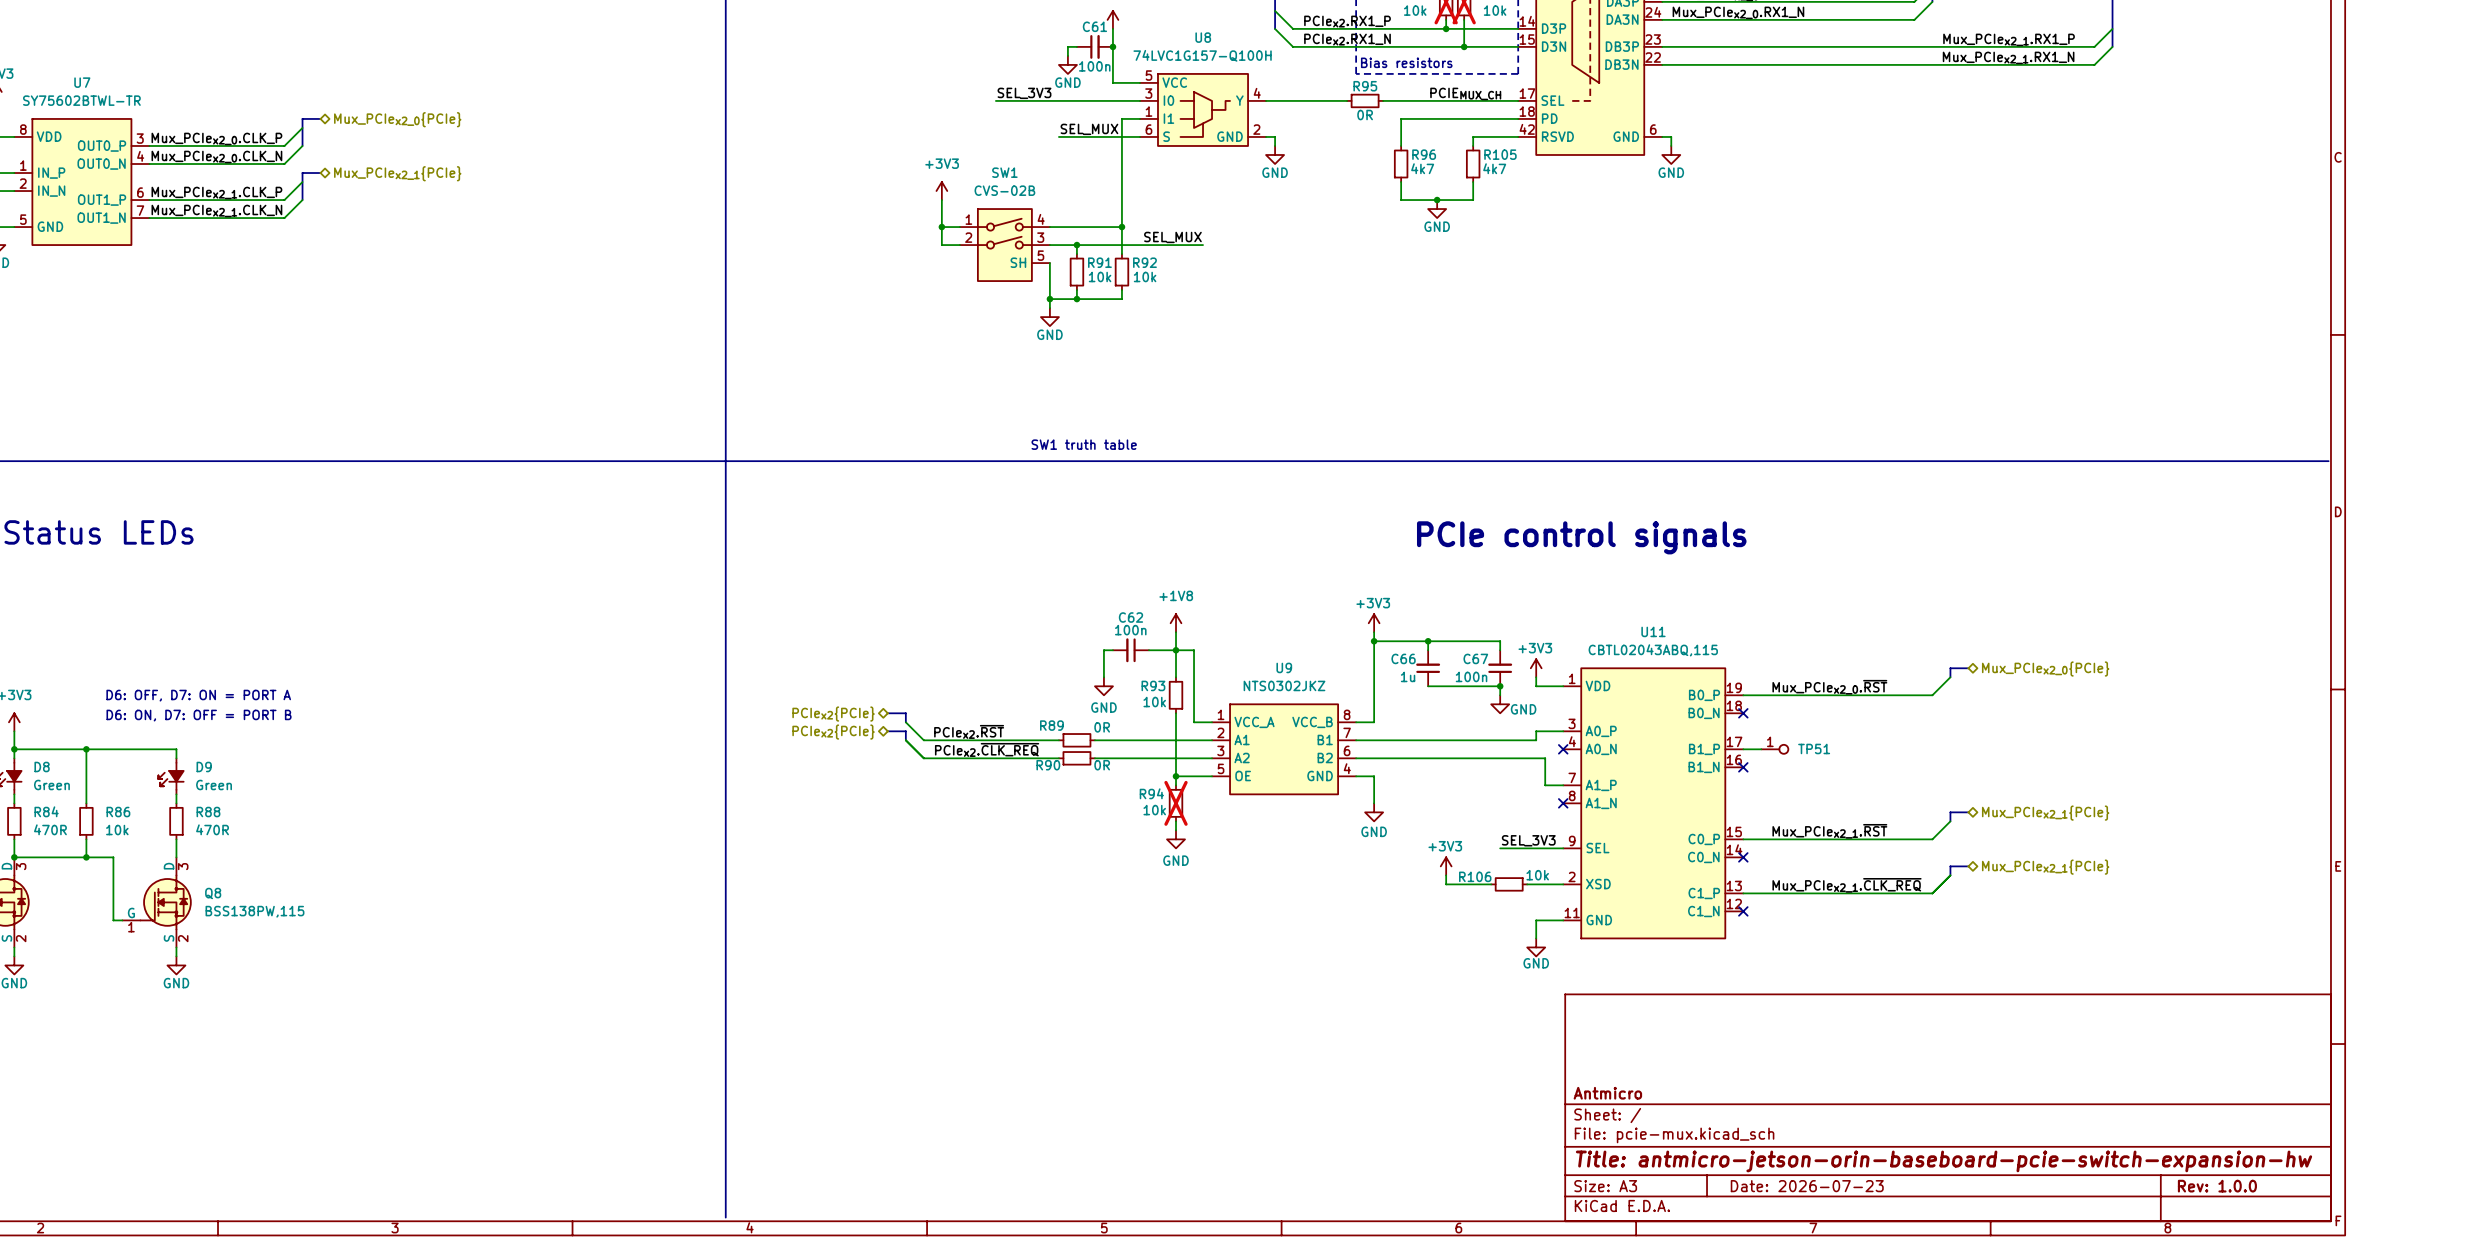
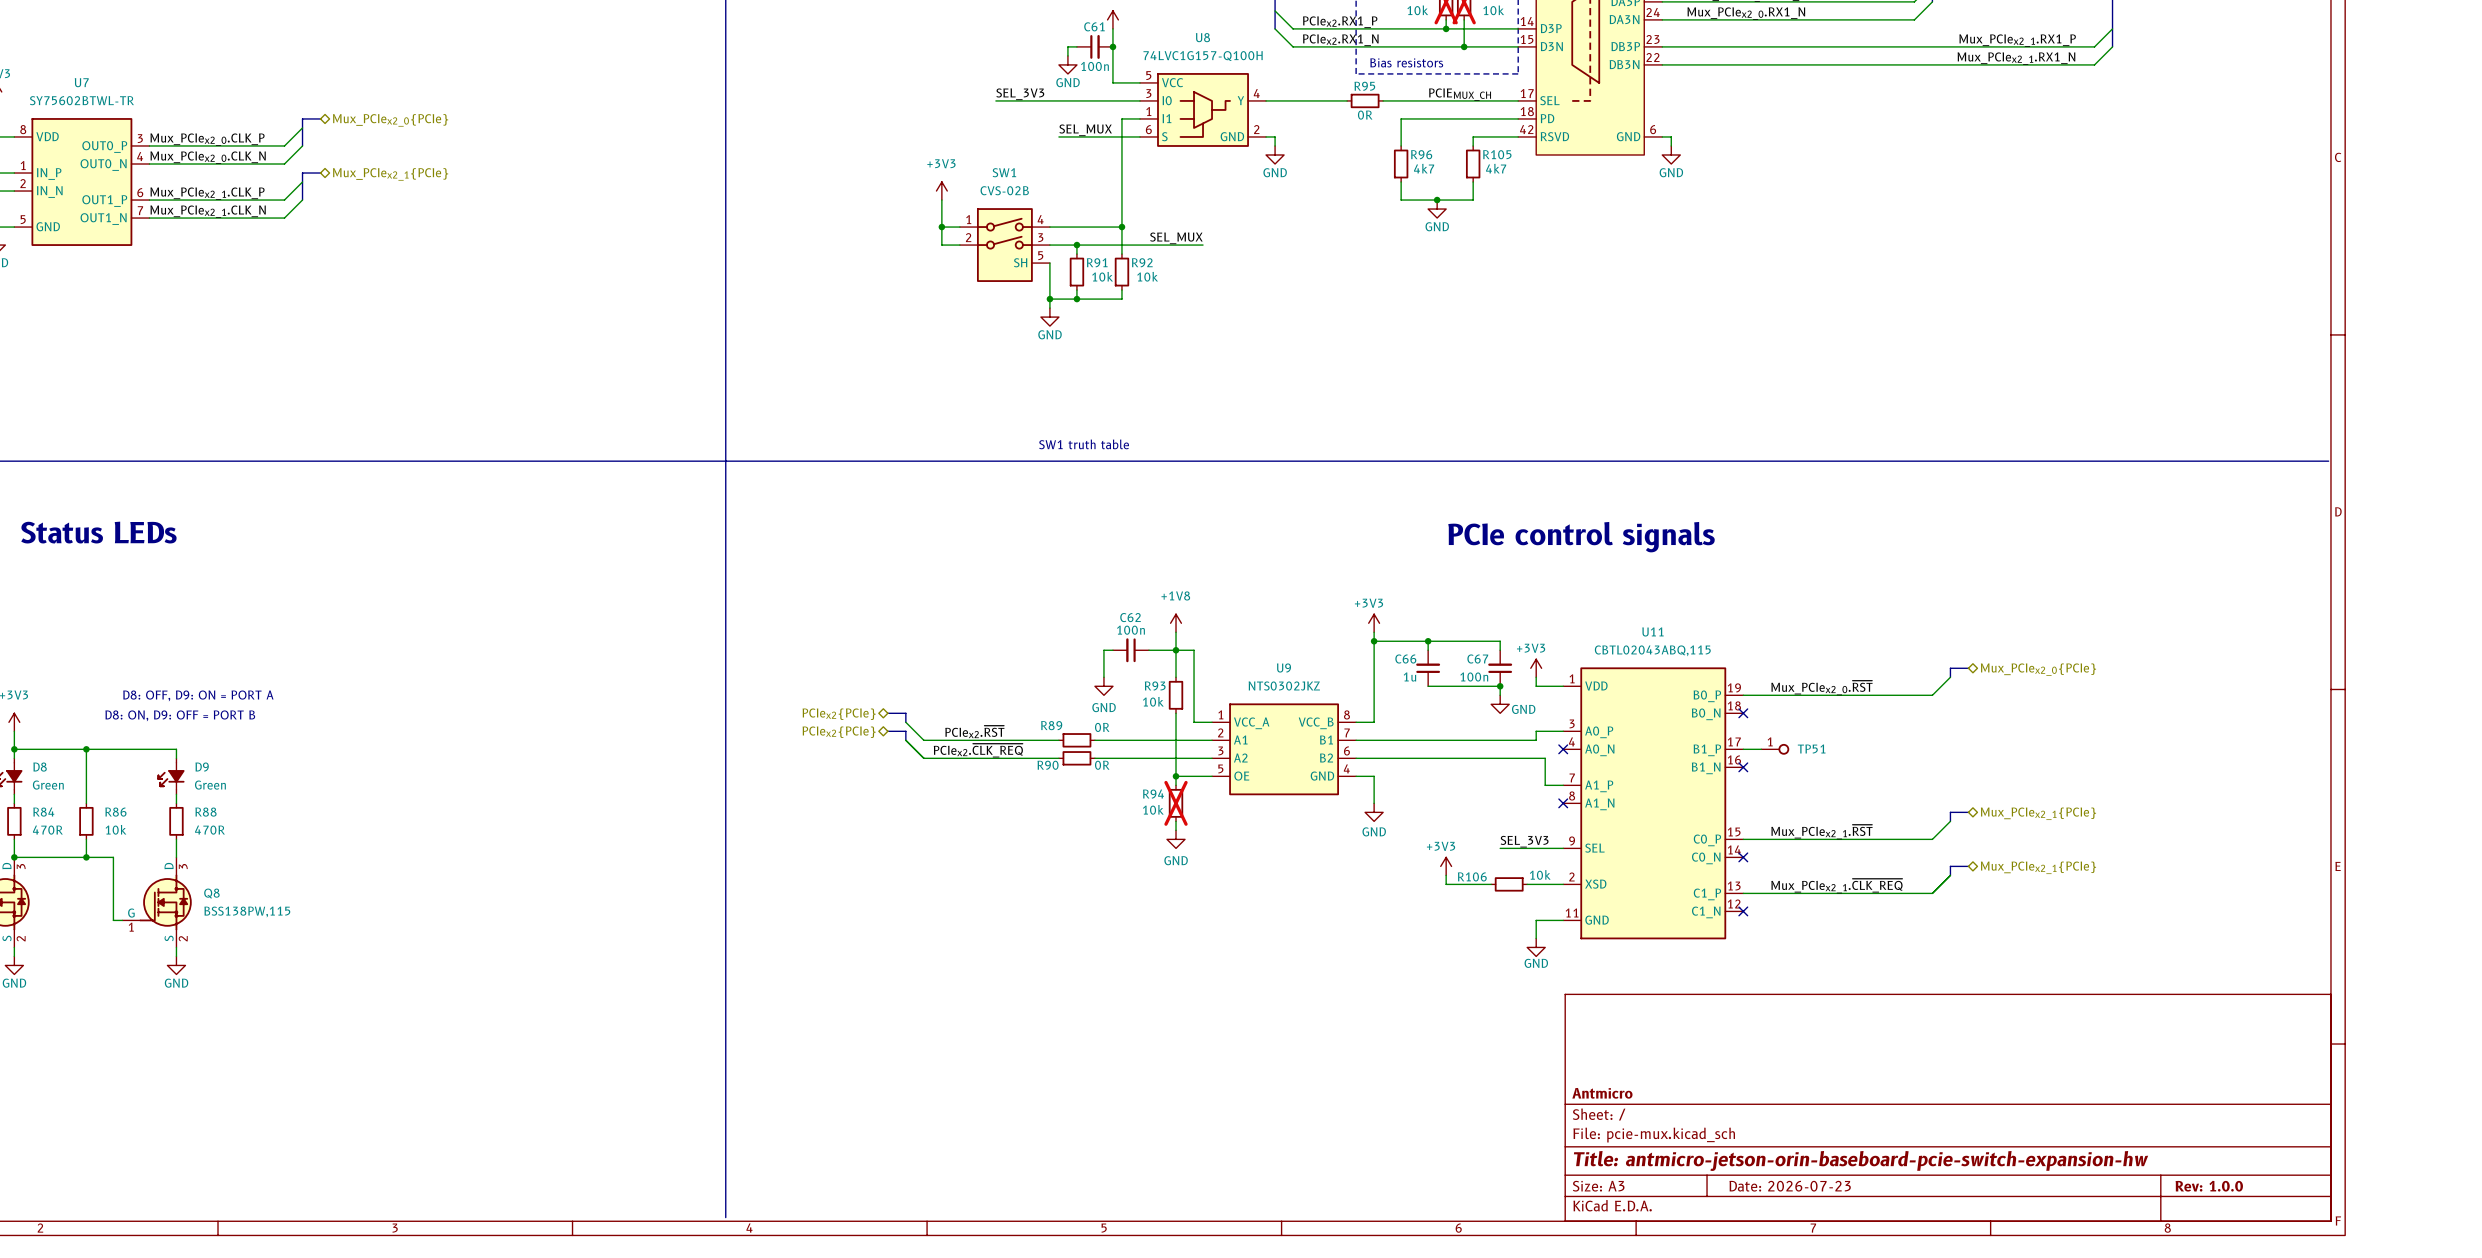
text: D6: OFF, D7: ON = PORT A (198, 695) -> D8: OFF, D9: ON = PORT A (198, 695)
text: D6: ON, D7: OFF = PORT B (199, 715) -> D8: ON, D9: OFF = PORT B (180, 715)

